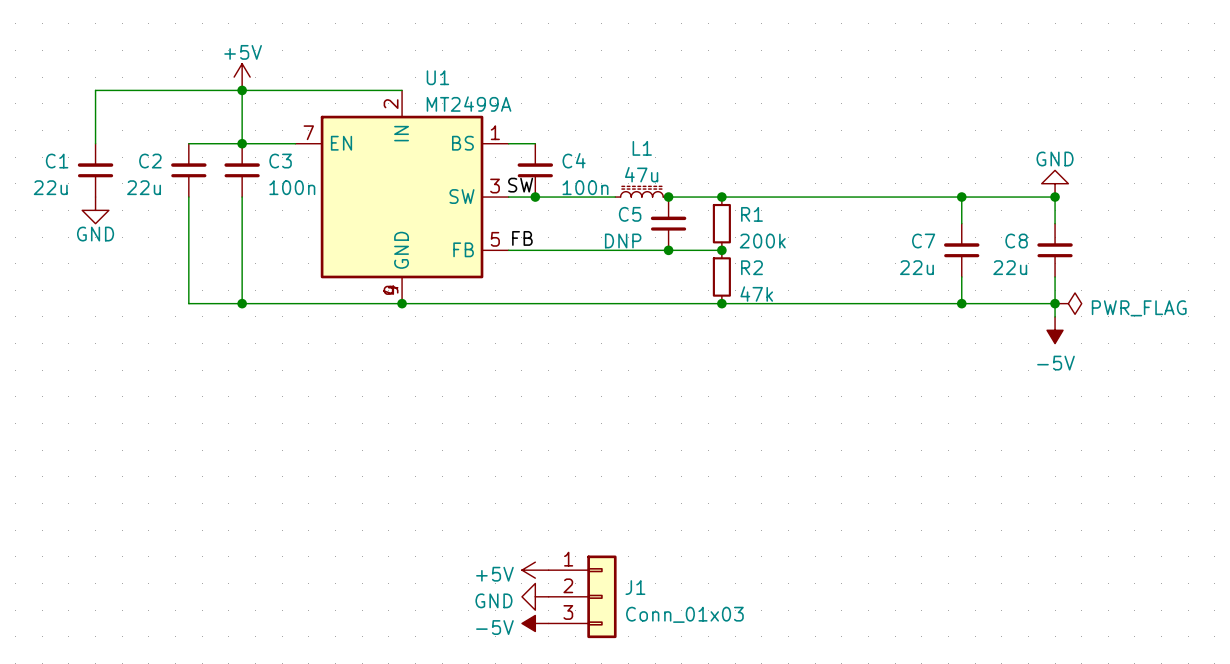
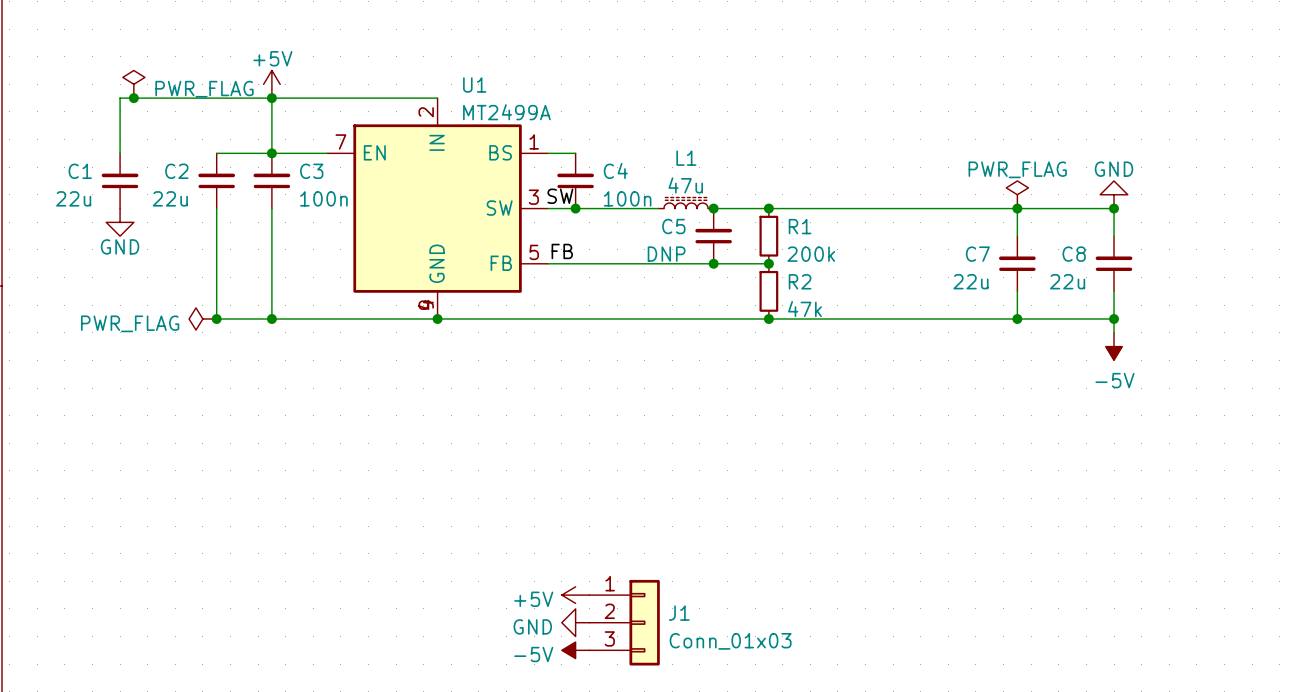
power symbol: none -> PWR_FLAG (133, 84)
junction: none -> (133, 98)
power symbol: none -> PWR_FLAG (202, 319)
junction: none -> (216, 319)
power symbol rotation: 0° (1068, 303) -> 90° counterclockwise (1017, 194)
power symbol position: PWR_FLAG (1068, 303) -> PWR_FLAG (1017, 194)
power symbol text position: PWR_FLAG (1139, 308) -> PWR_FLAG (1017, 169)

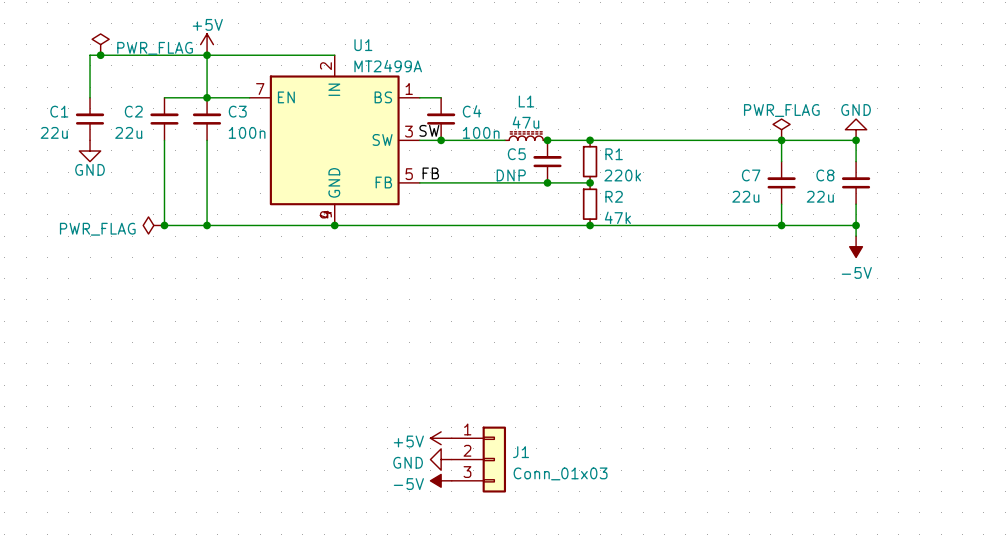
R1 value: 200k (811, 254) -> 220k (622, 175)

